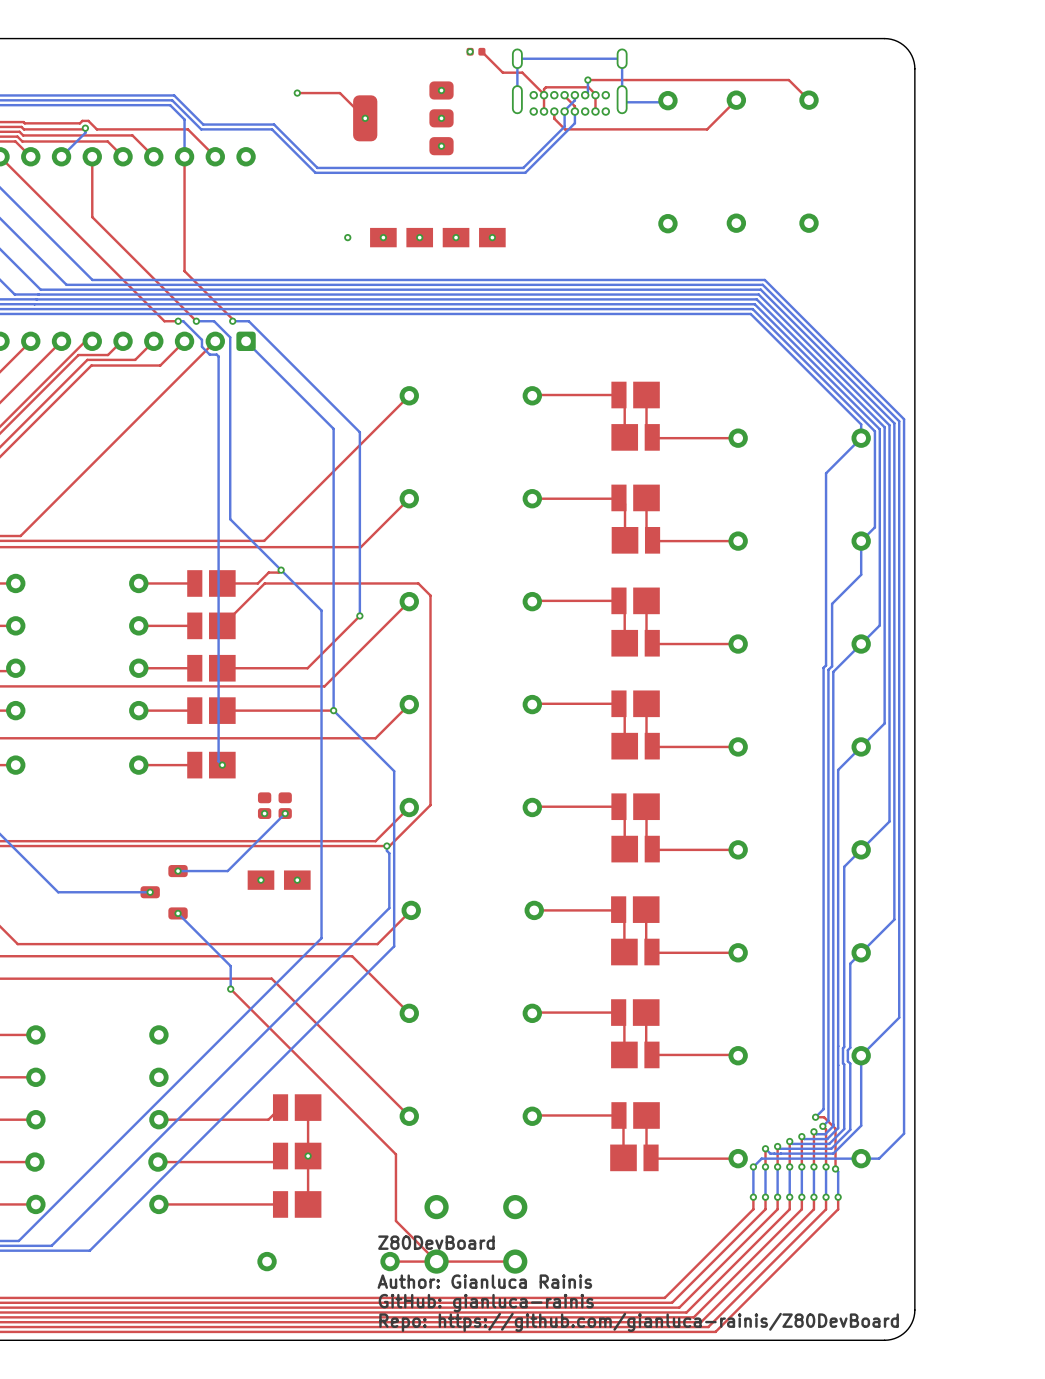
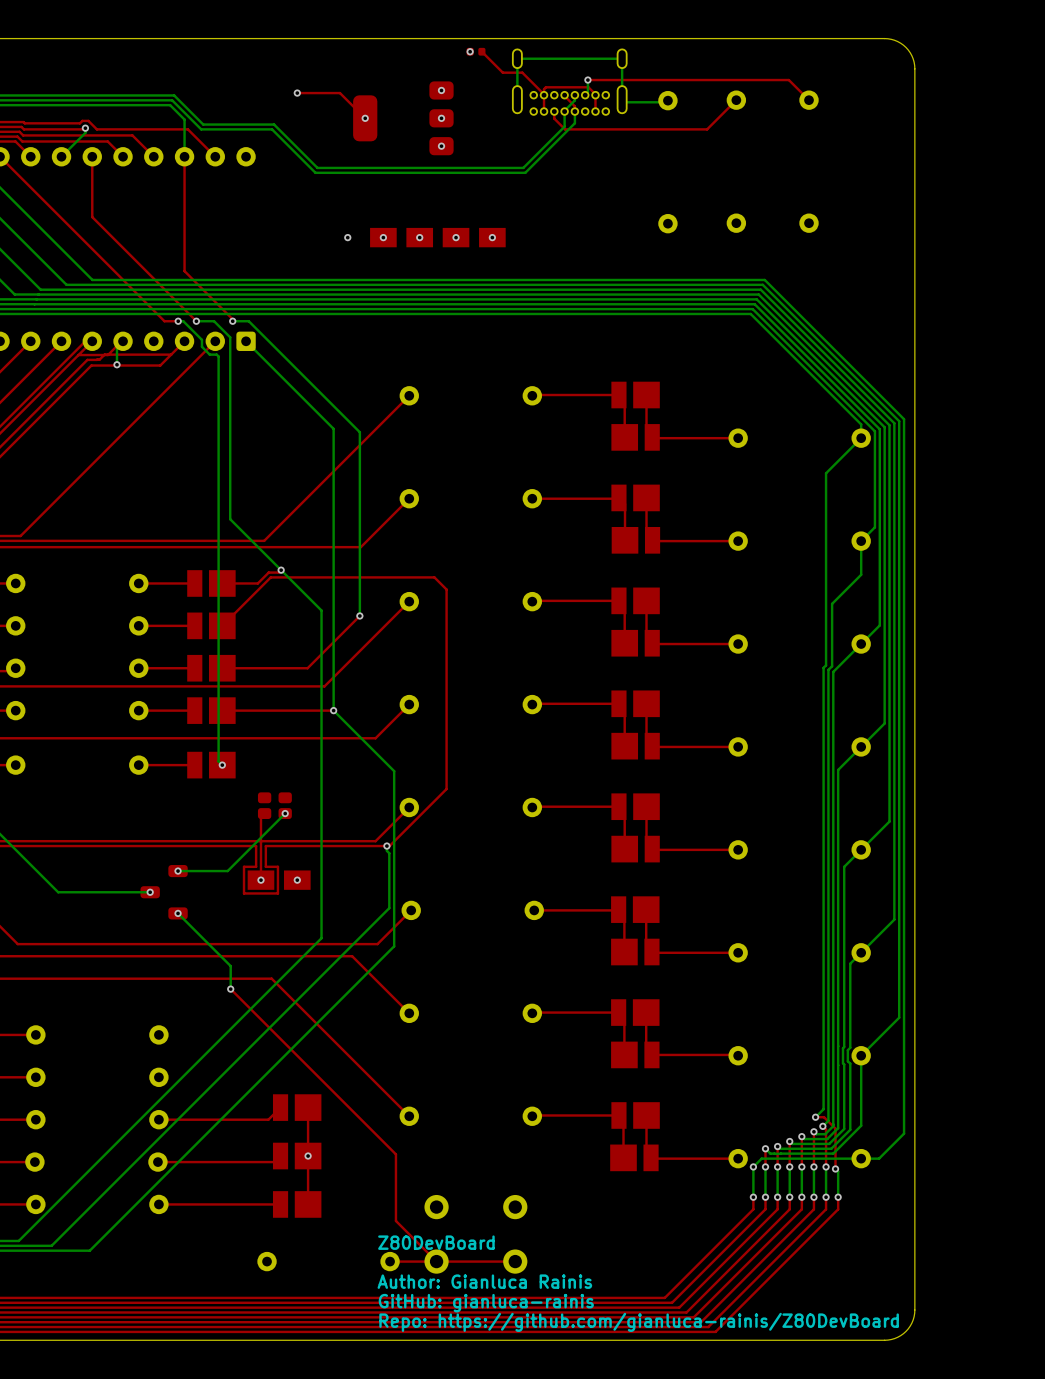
top track: (153, 341) (135, 359) (97, 359) -> (171, 354) (104, 354) (97, 359)
bottom track: none -> (116, 347) (116, 364)
via: none -> (116, 364)
top track: (264, 583) (418, 583) (430, 595) (430, 805) -> (264, 583) (270, 577) (434, 577) (446, 589) (446, 789) (430, 805)
via: (264, 813) -> none
top track: none -> (260, 817) (260, 880)
top track: (265, 846) (256, 846) -> (265, 846) (265, 866) (277, 866) (277, 893) (244, 893) (244, 866) (256, 866) (256, 846)

